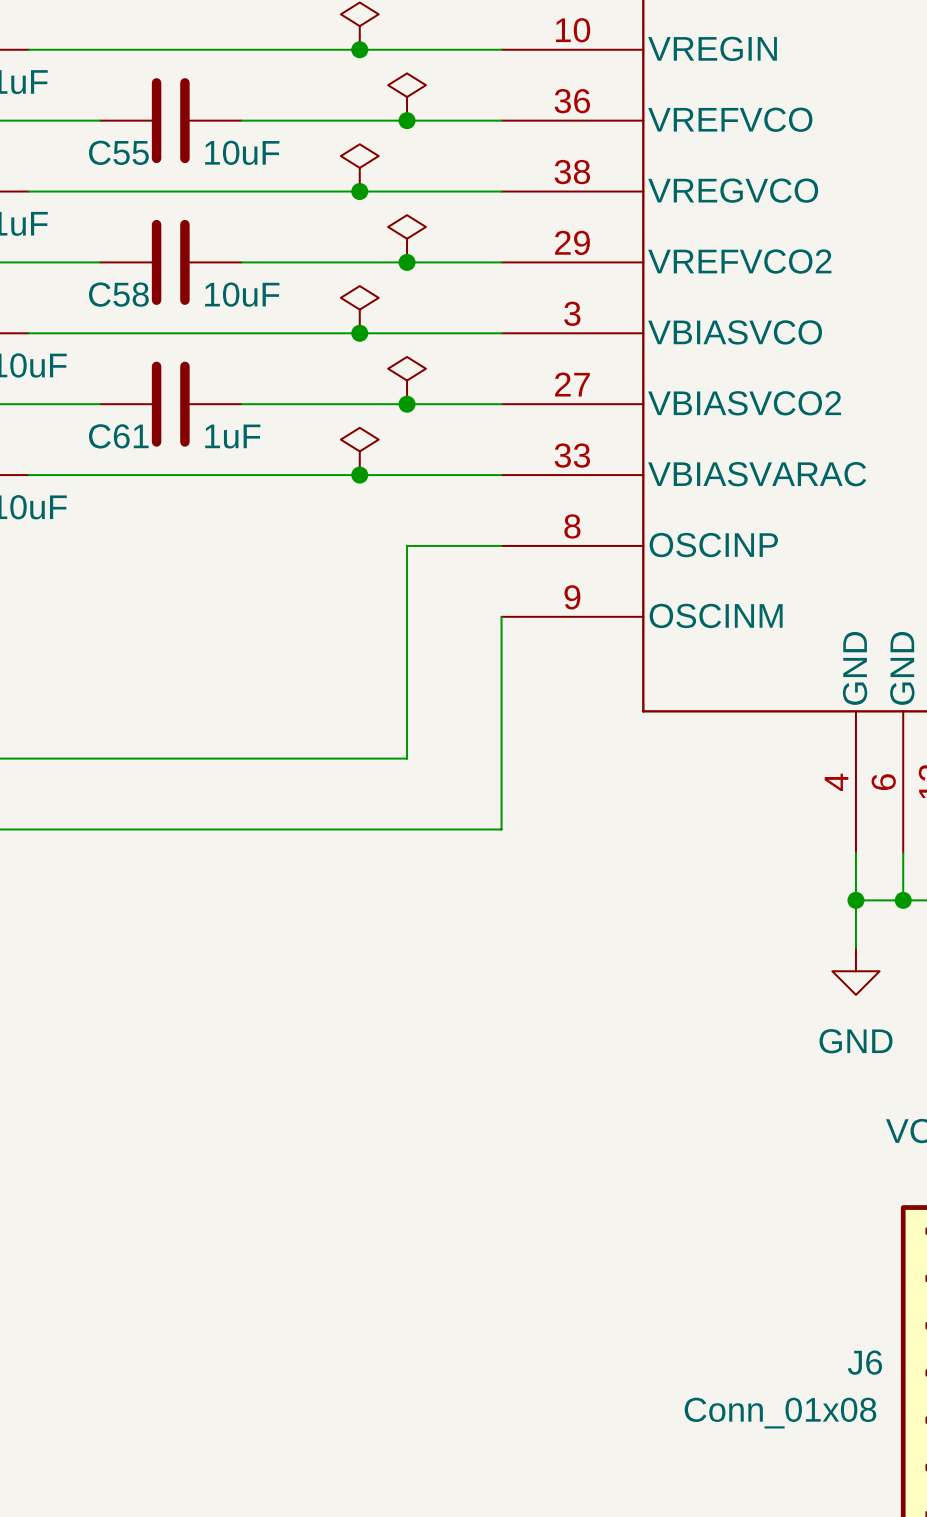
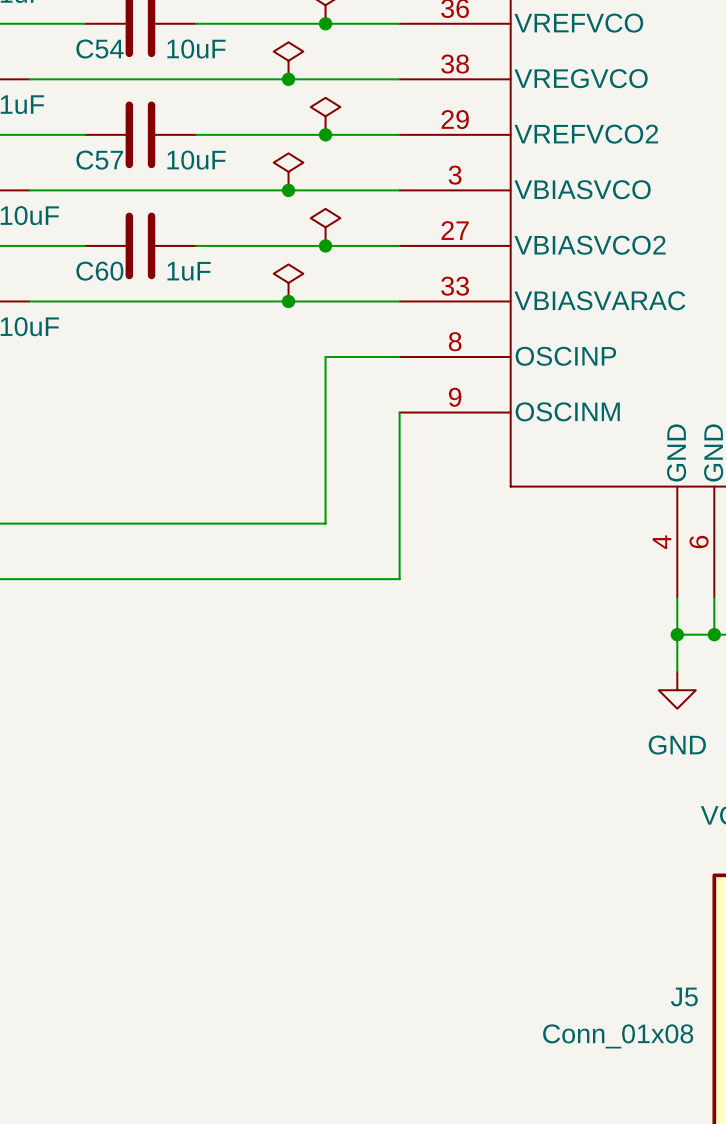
C55 name: C55 (118, 152) -> C54 (99, 49)
C58 name: C58 (118, 294) -> C57 (99, 160)
C61 name: C61 (118, 436) -> C60 (99, 271)
J6 name: J6 (864, 1362) -> J5 (684, 996)

